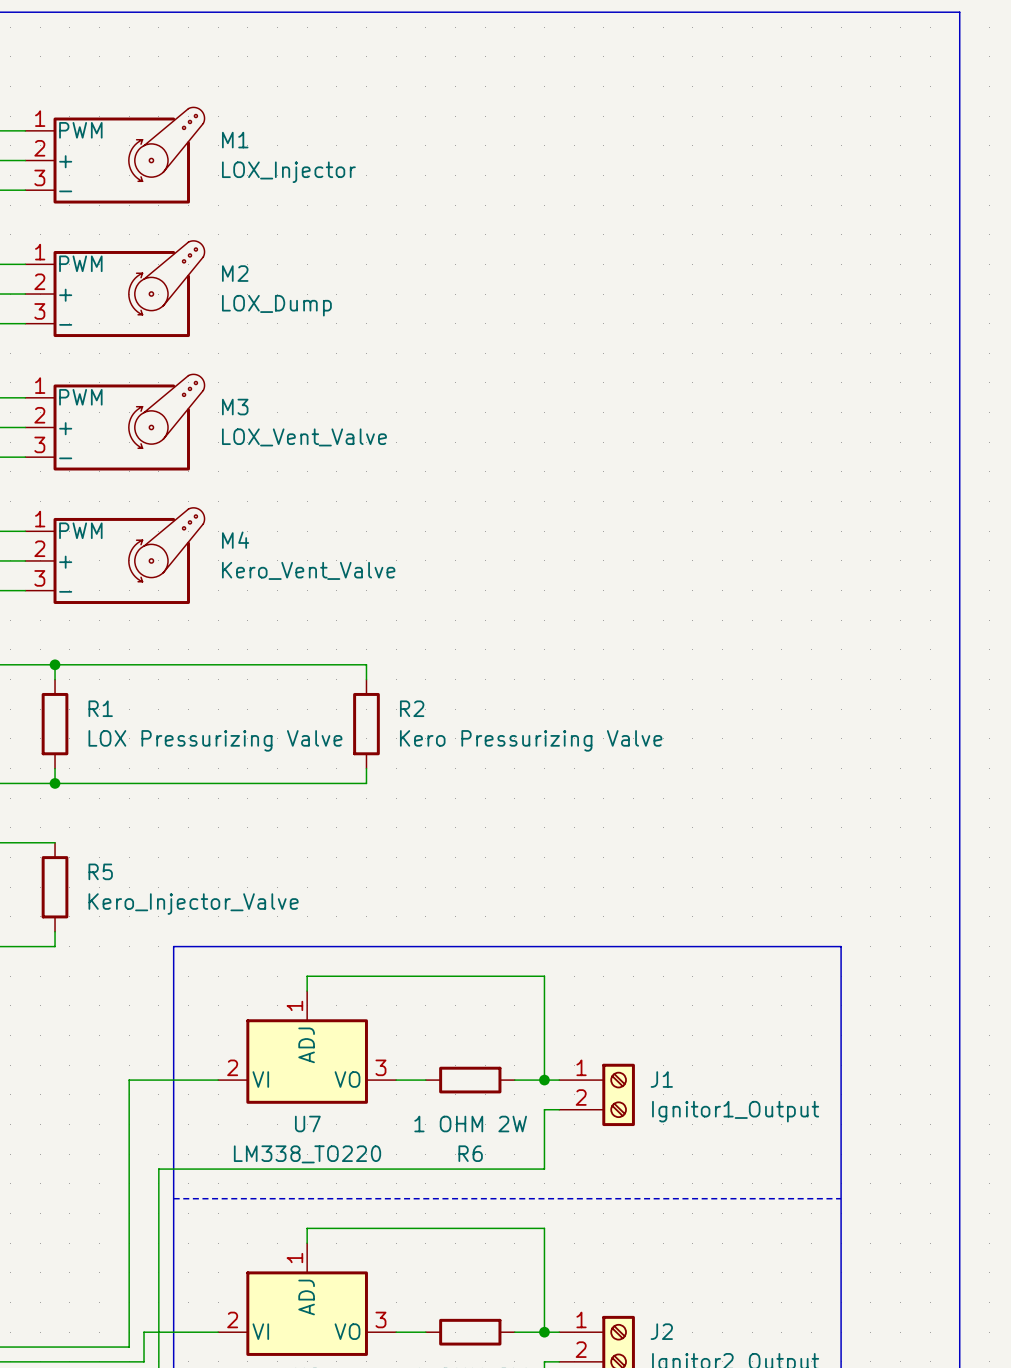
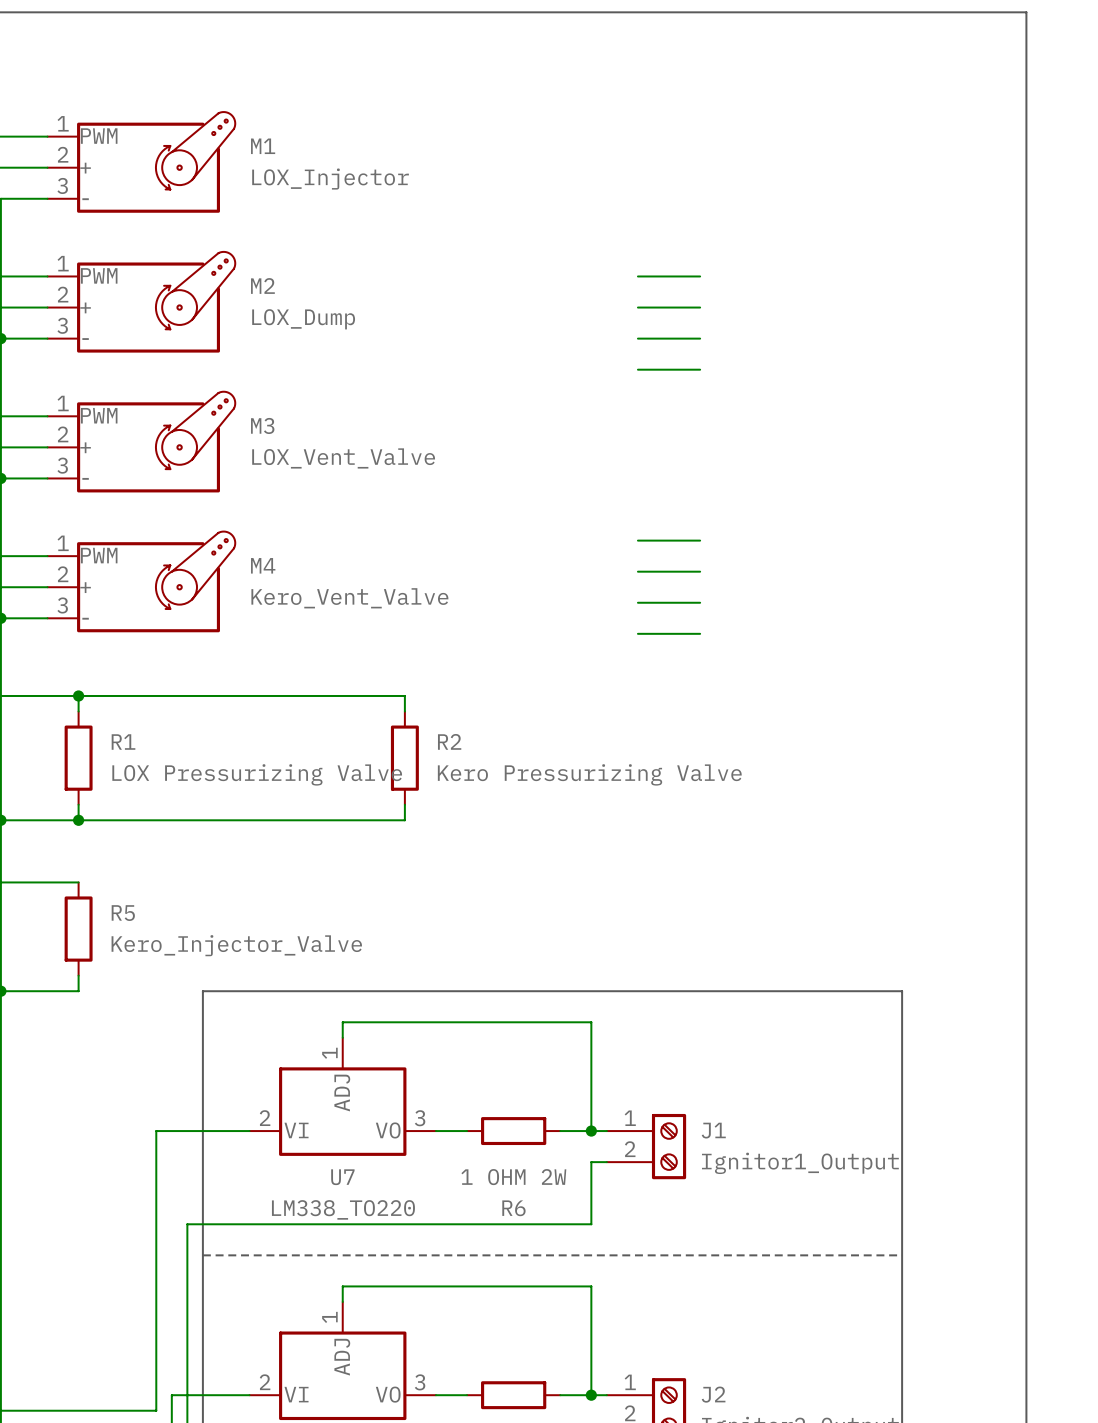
wire: none -> (637, 276) (700, 276)
wire: none -> (637, 307) (700, 307)
wire: none -> (637, 338) (700, 338)
wire: none -> (637, 369) (700, 369)
wire: none -> (637, 540) (700, 540)
wire: none -> (637, 571) (700, 571)
wire: none -> (637, 602) (700, 602)
wire: none -> (637, 633) (700, 633)

